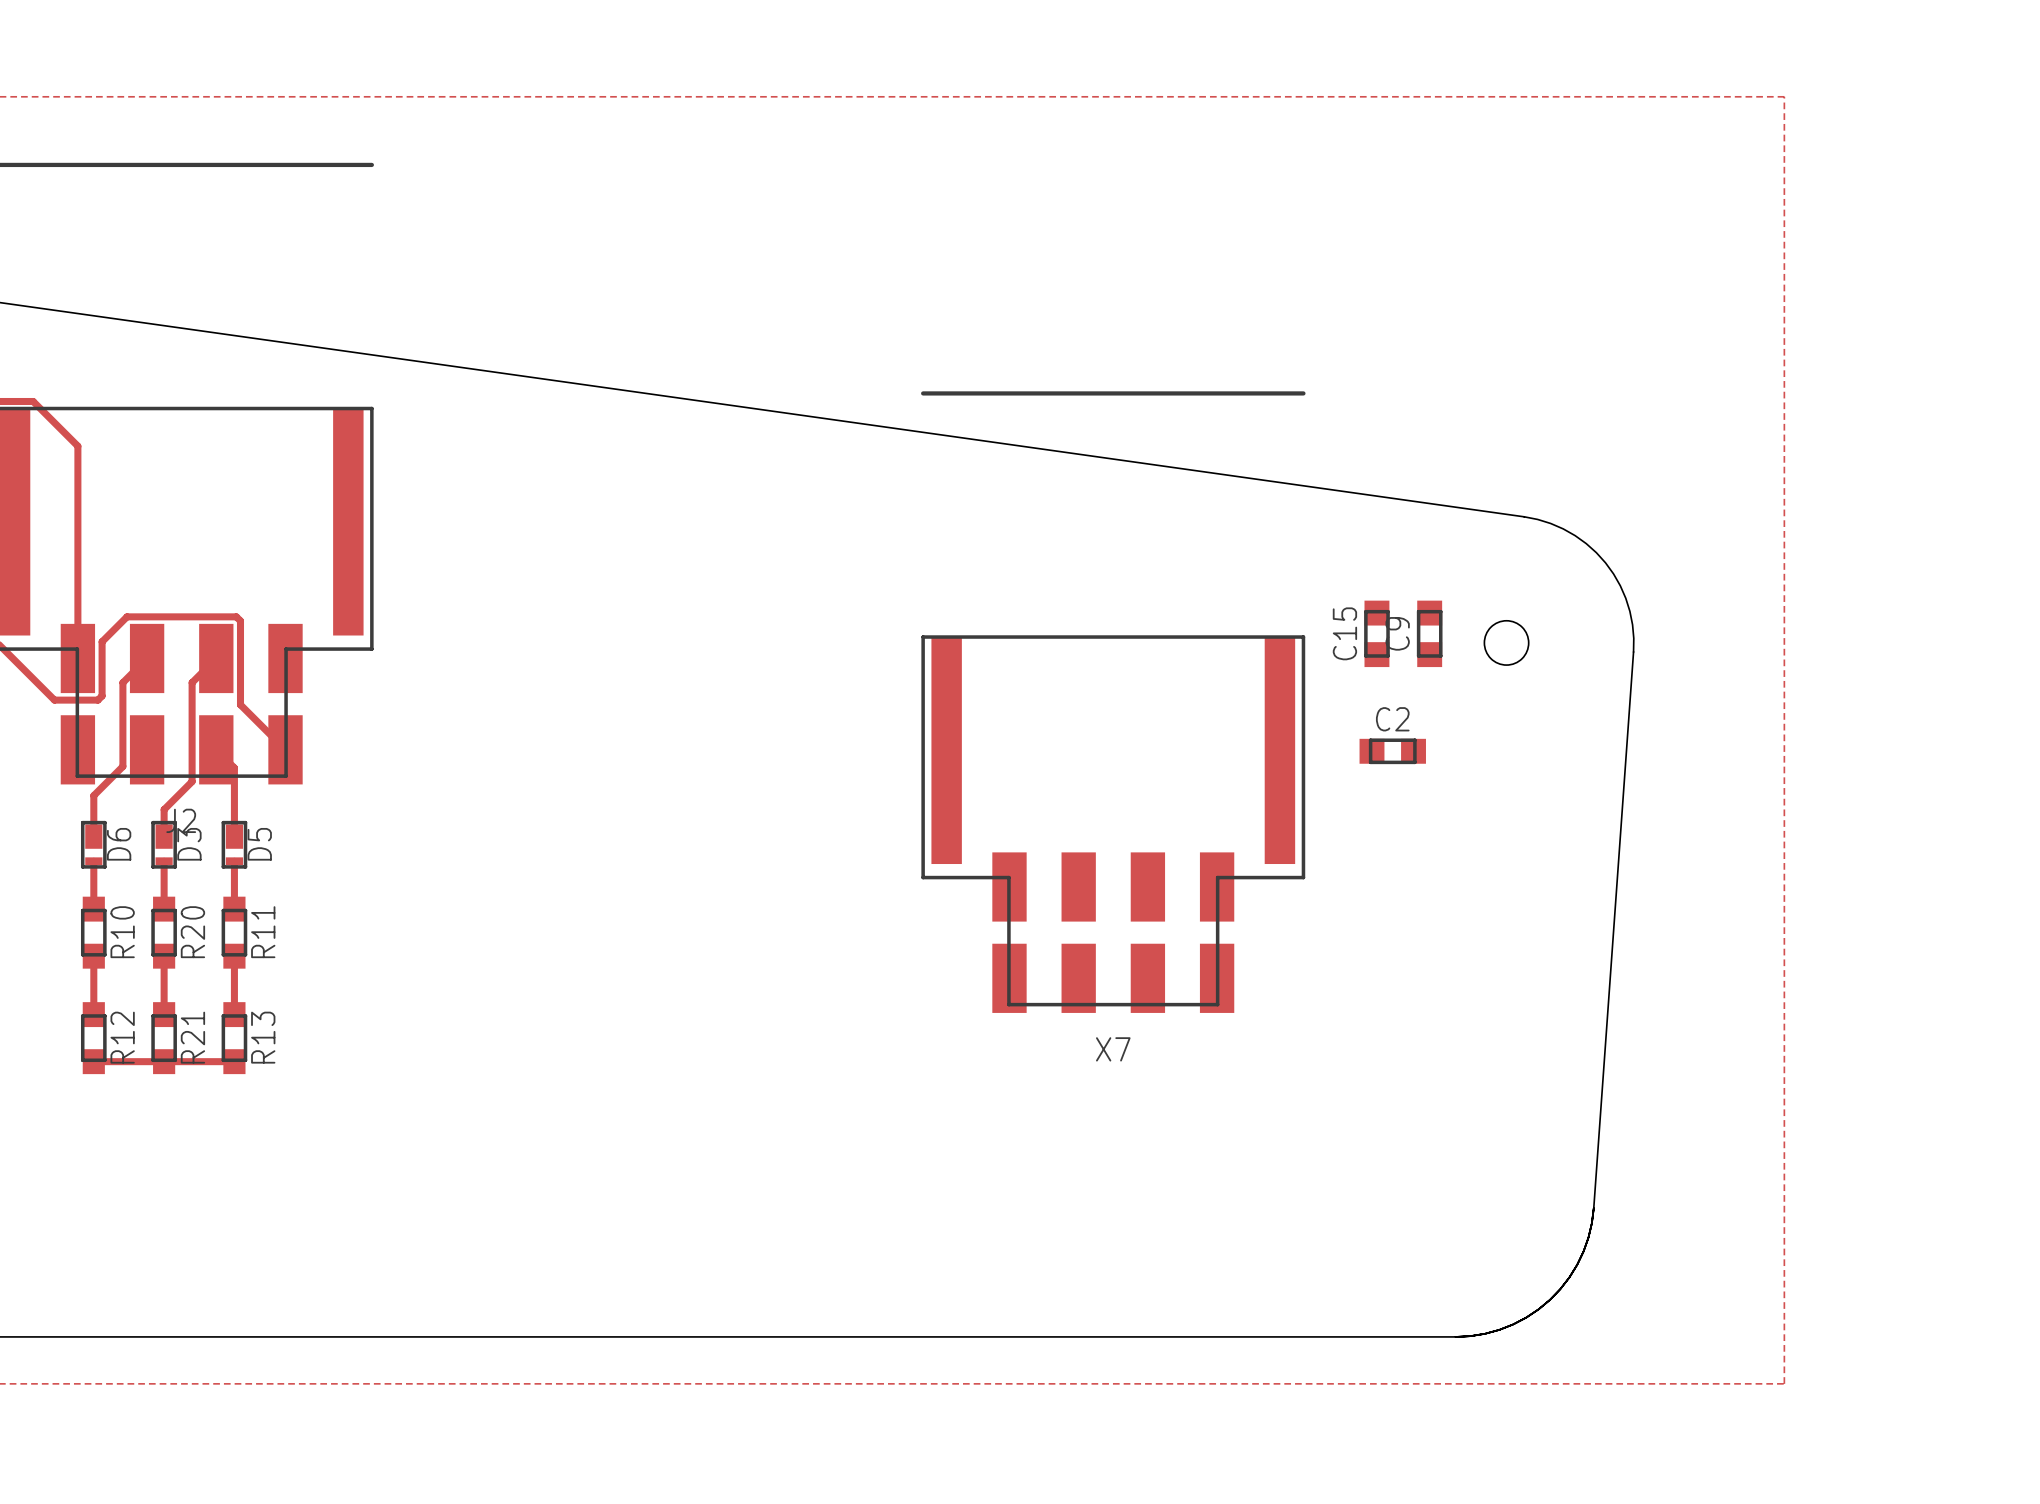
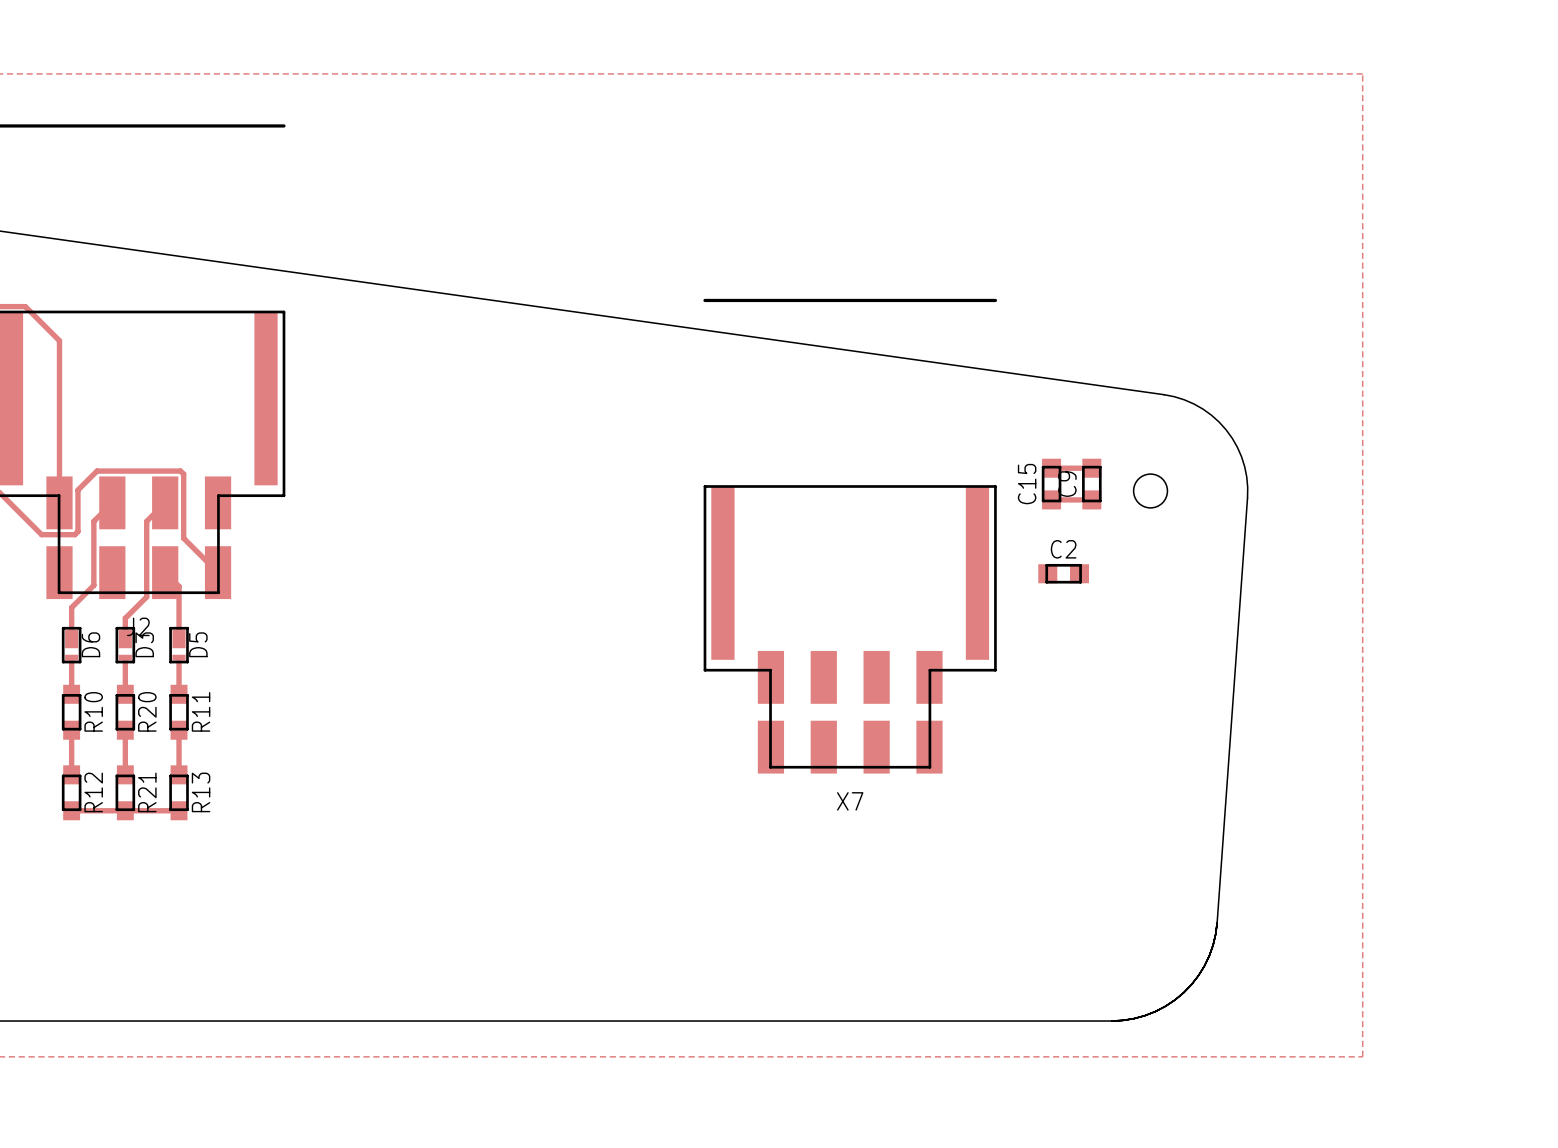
track: none -> (1051, 468) (1091, 468)
track: none -> (1051, 499) (1091, 499)

